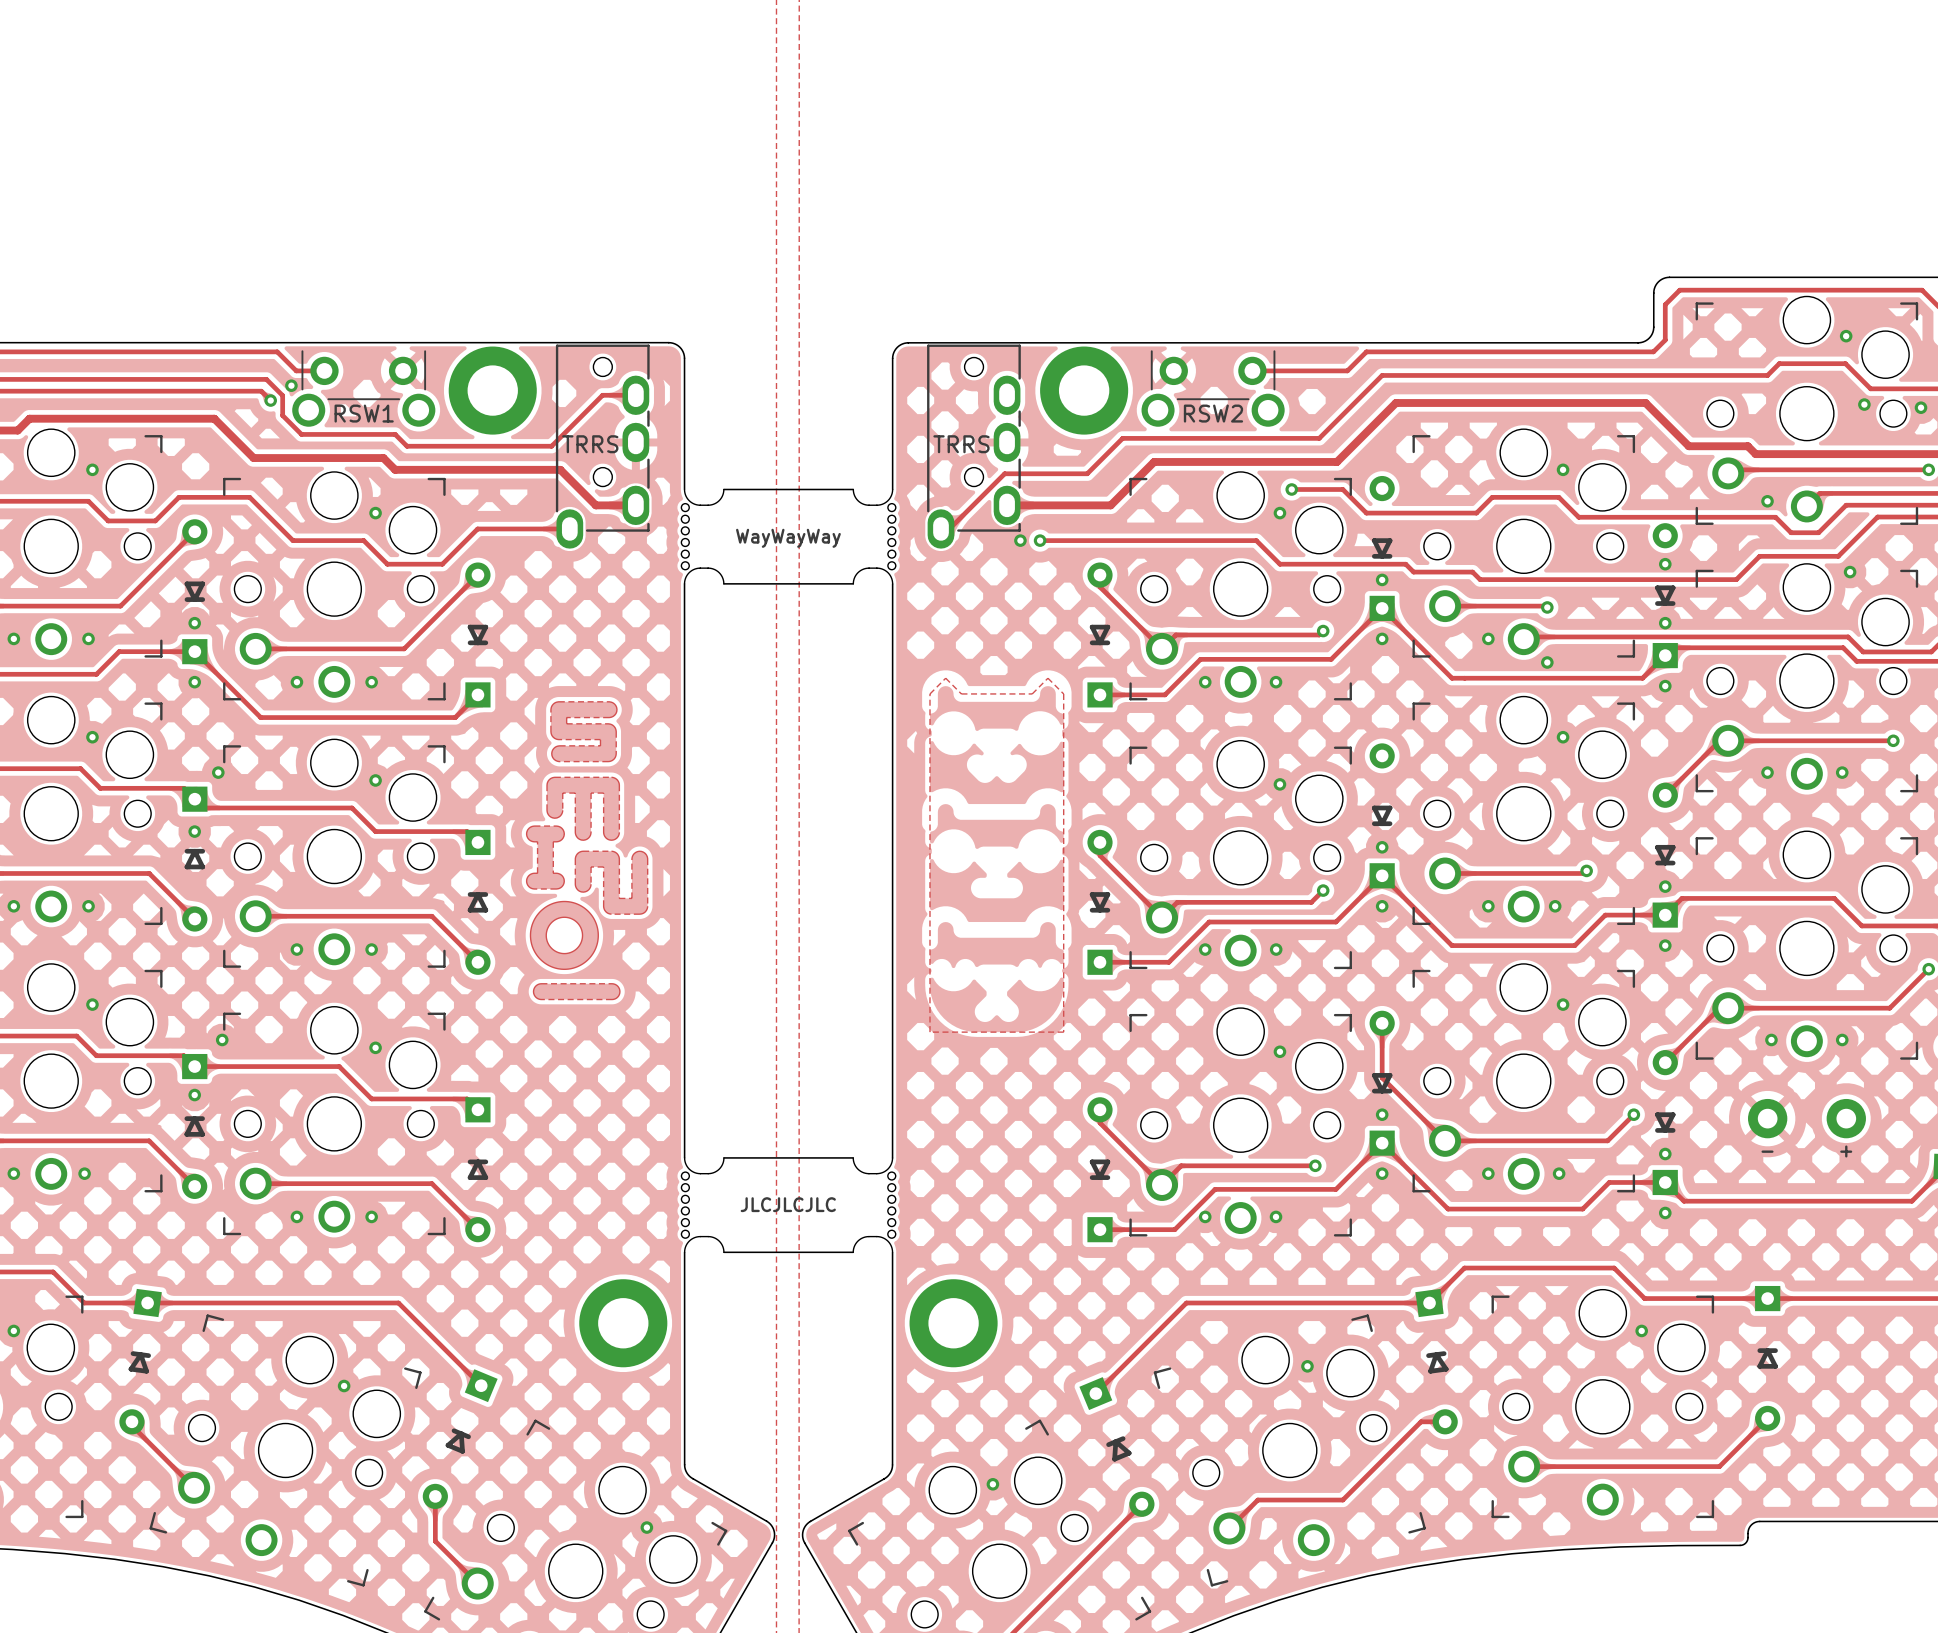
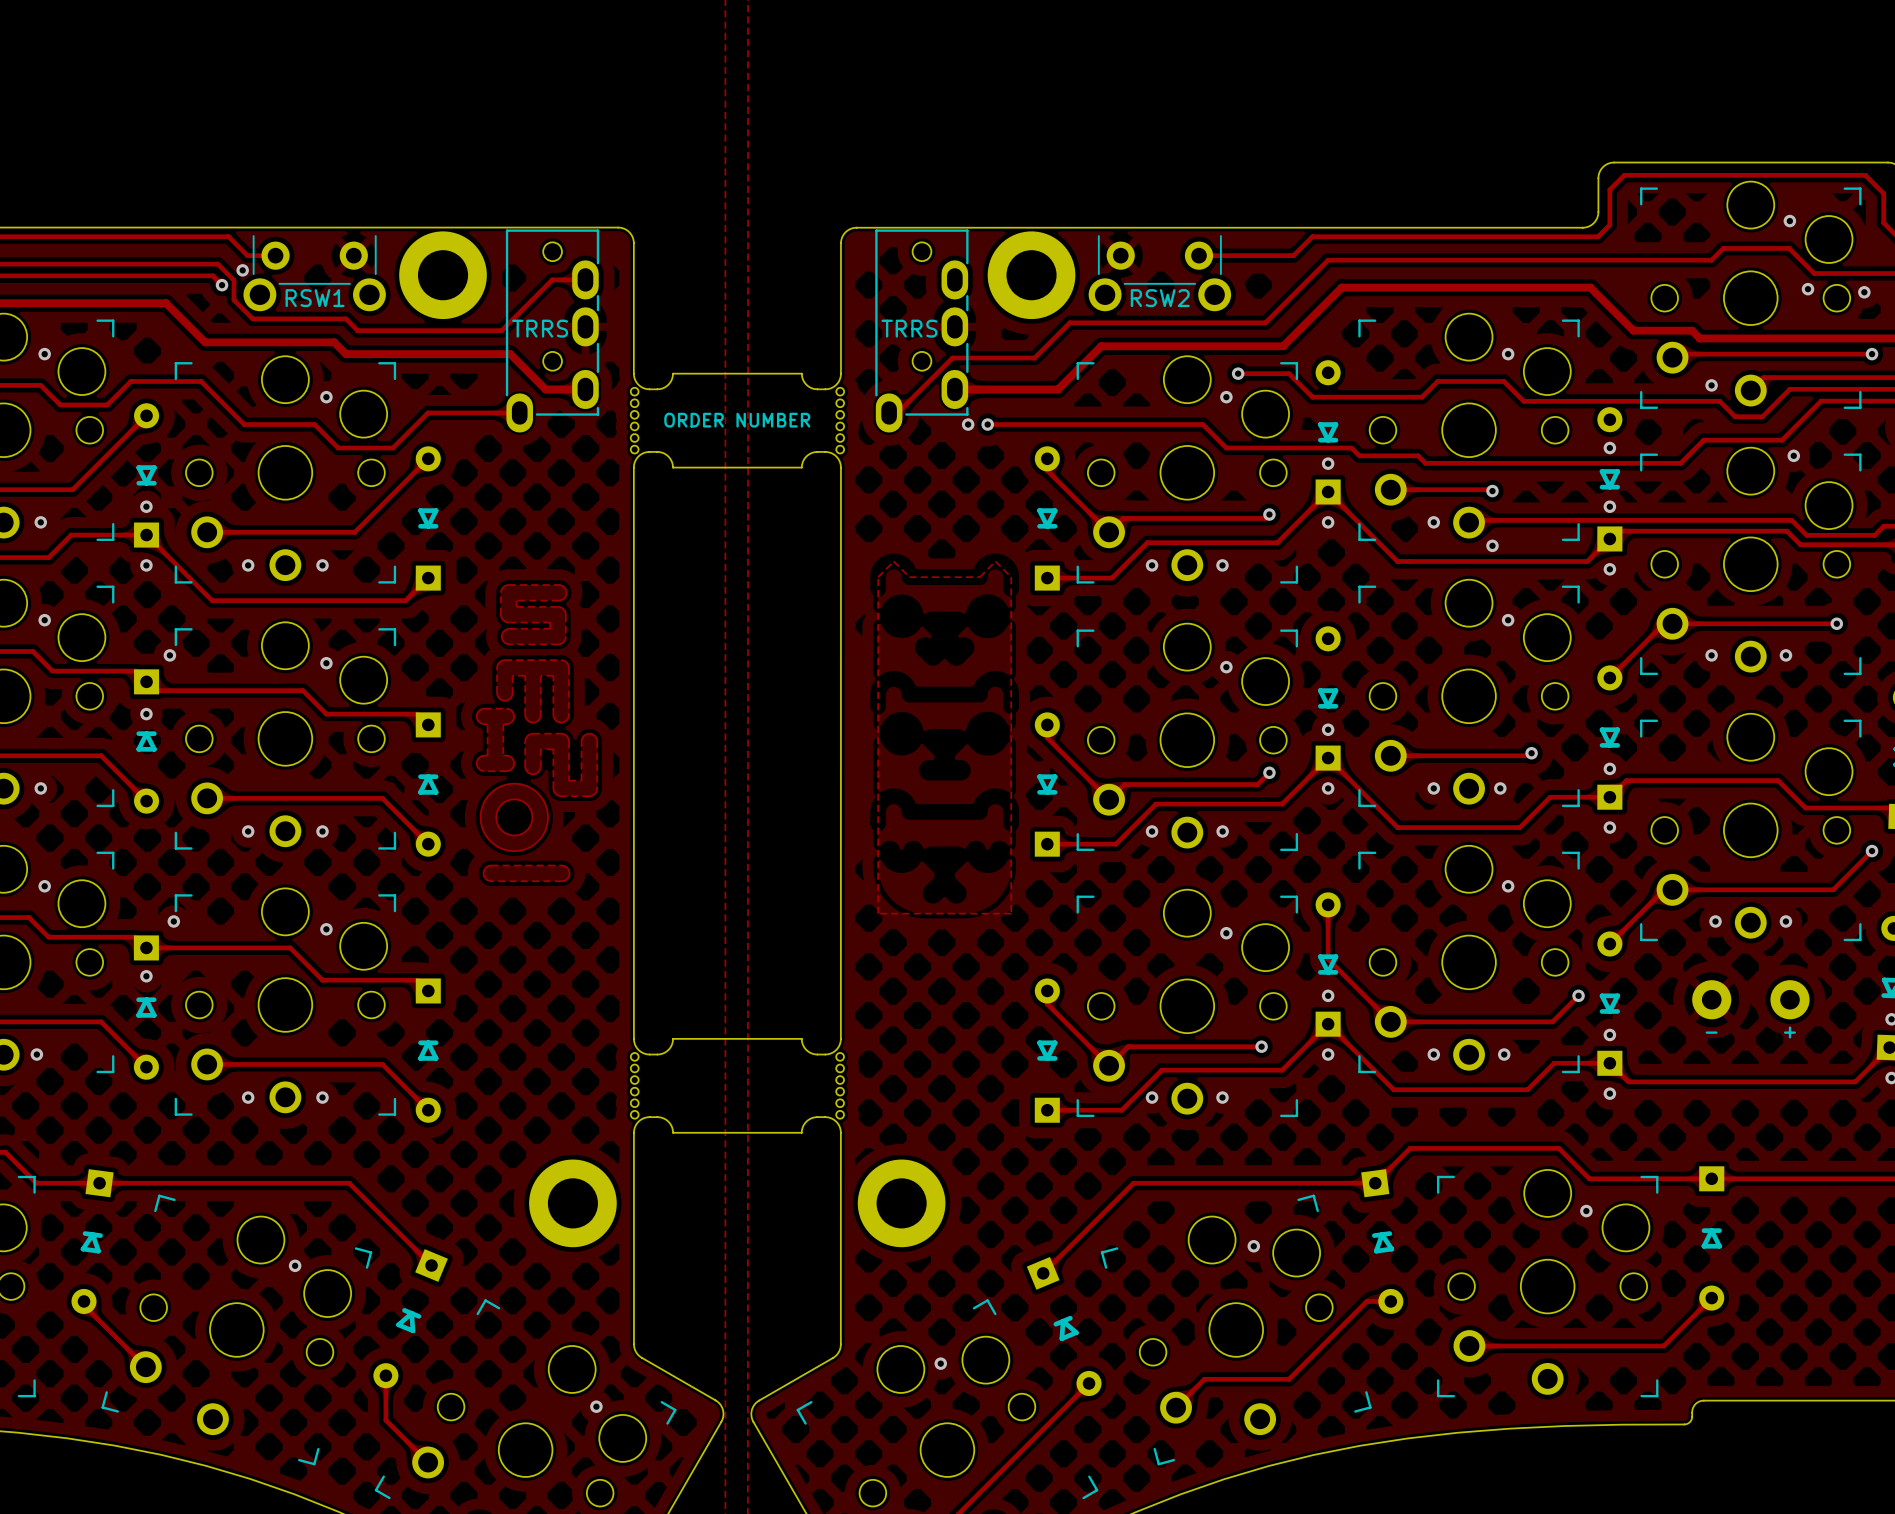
text: WayWayWay (788, 538) -> ORDER NUMBER (737, 420)
text: JLCJLCJLC (788, 1204) -> none

